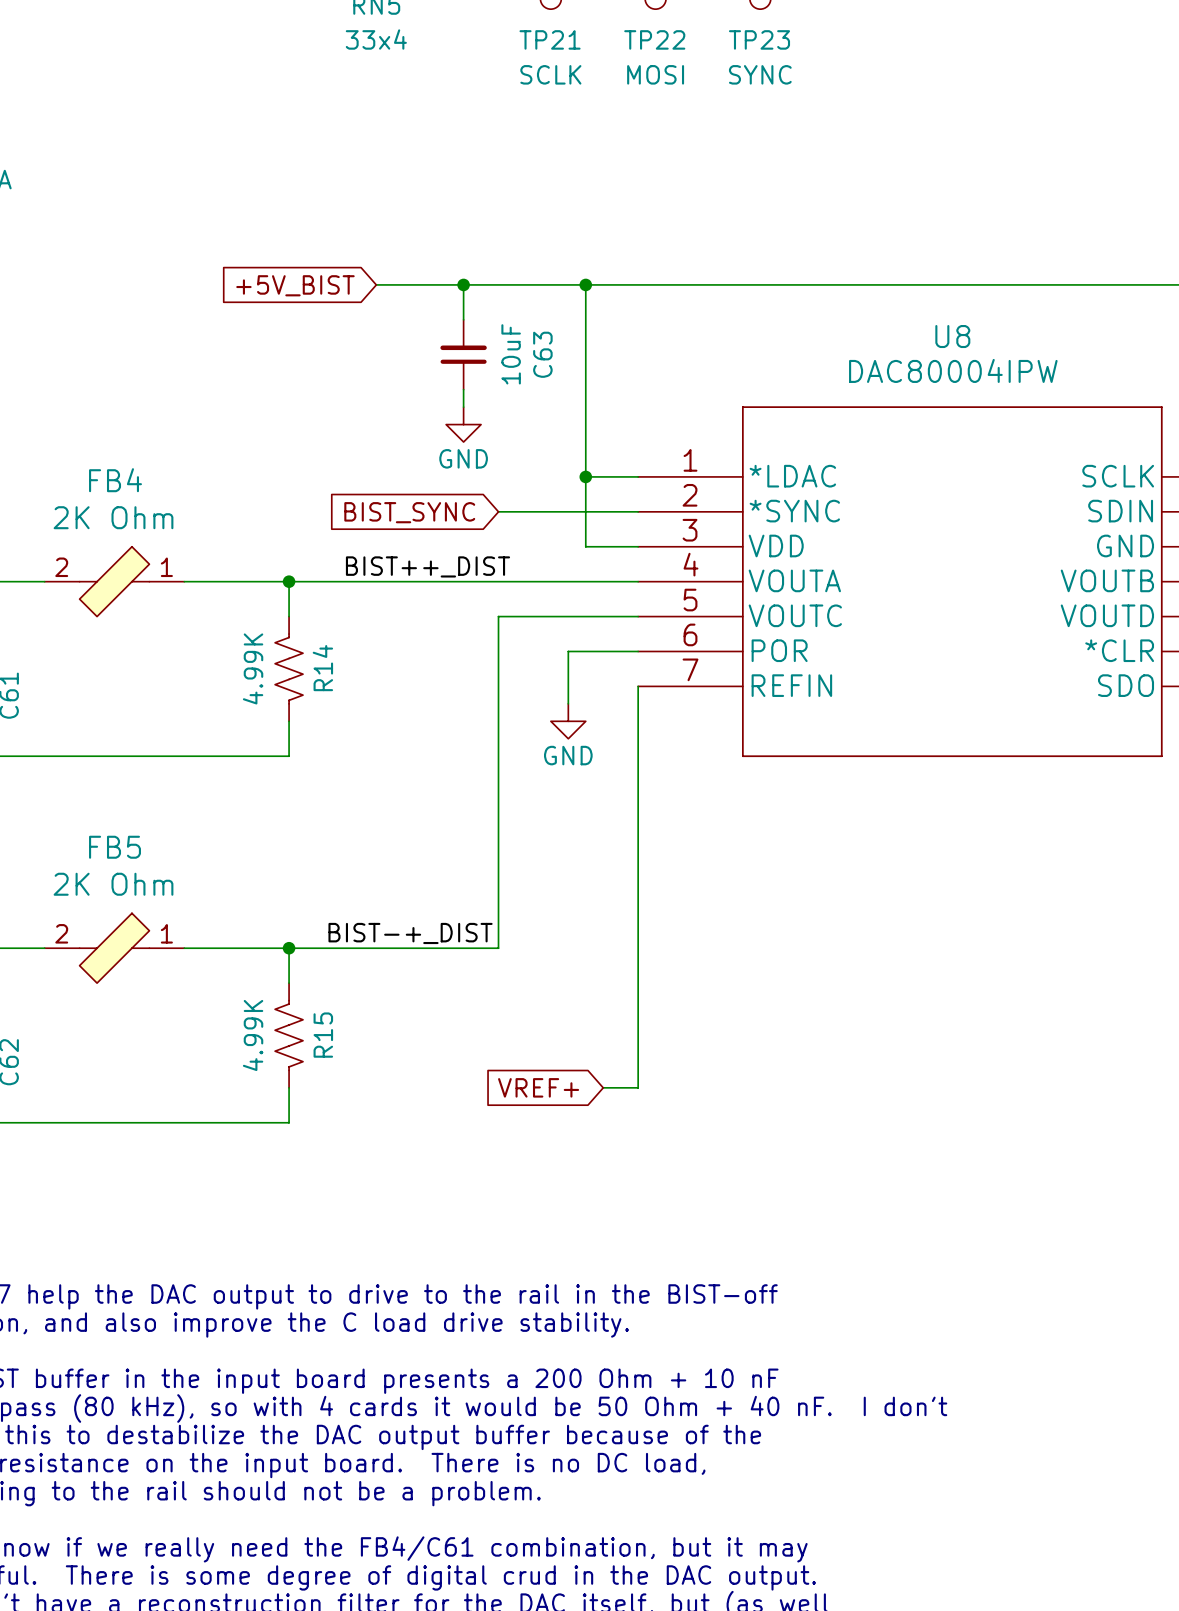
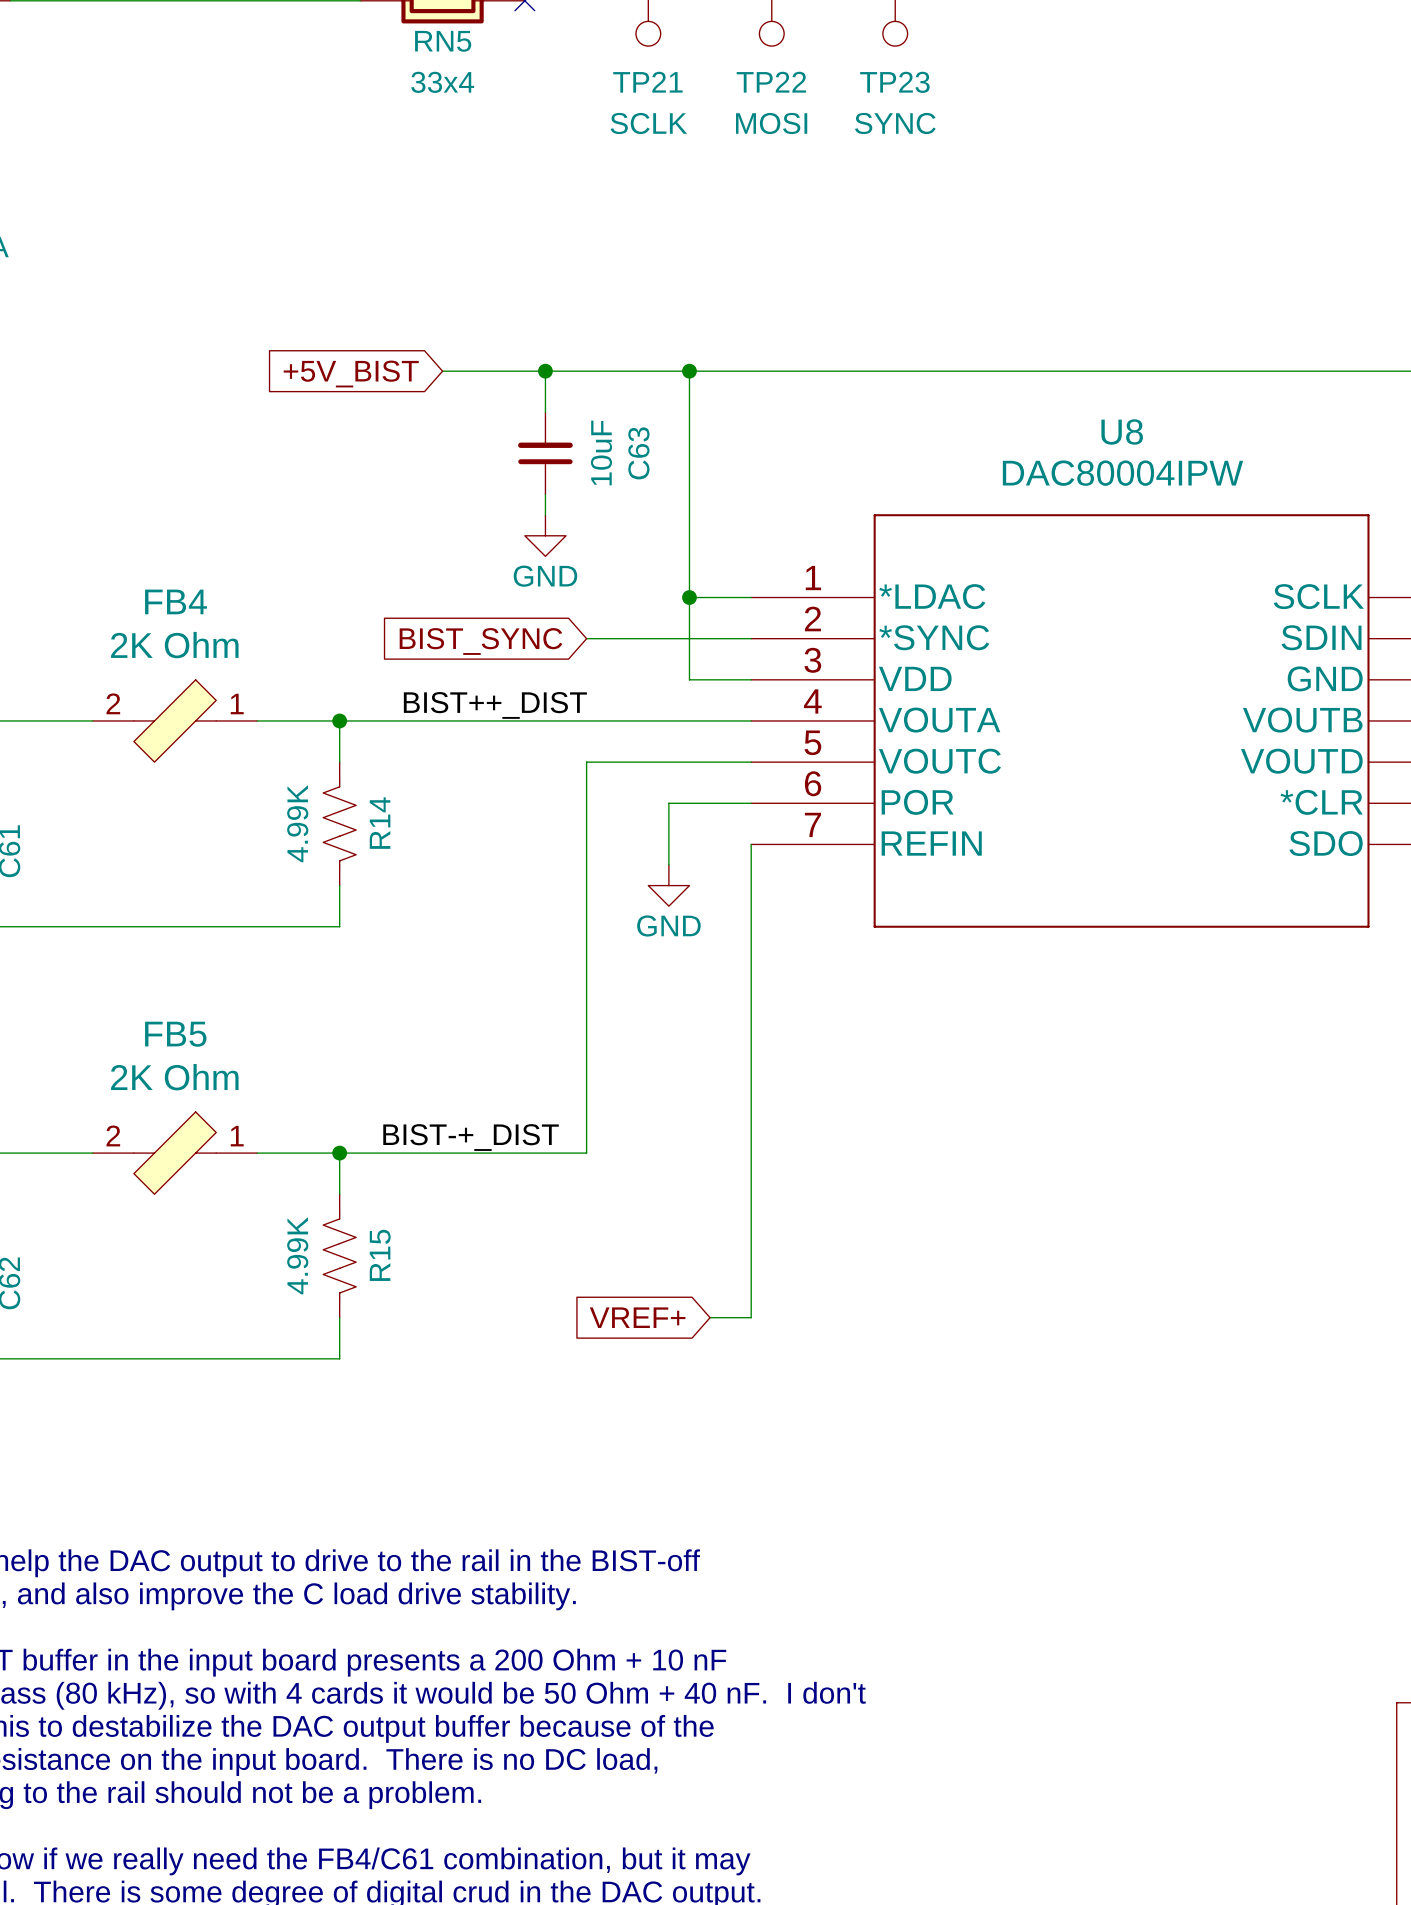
FB4 position: (114, 581) -> (175, 720)
FB5 position: (114, 948) -> (175, 1153)

